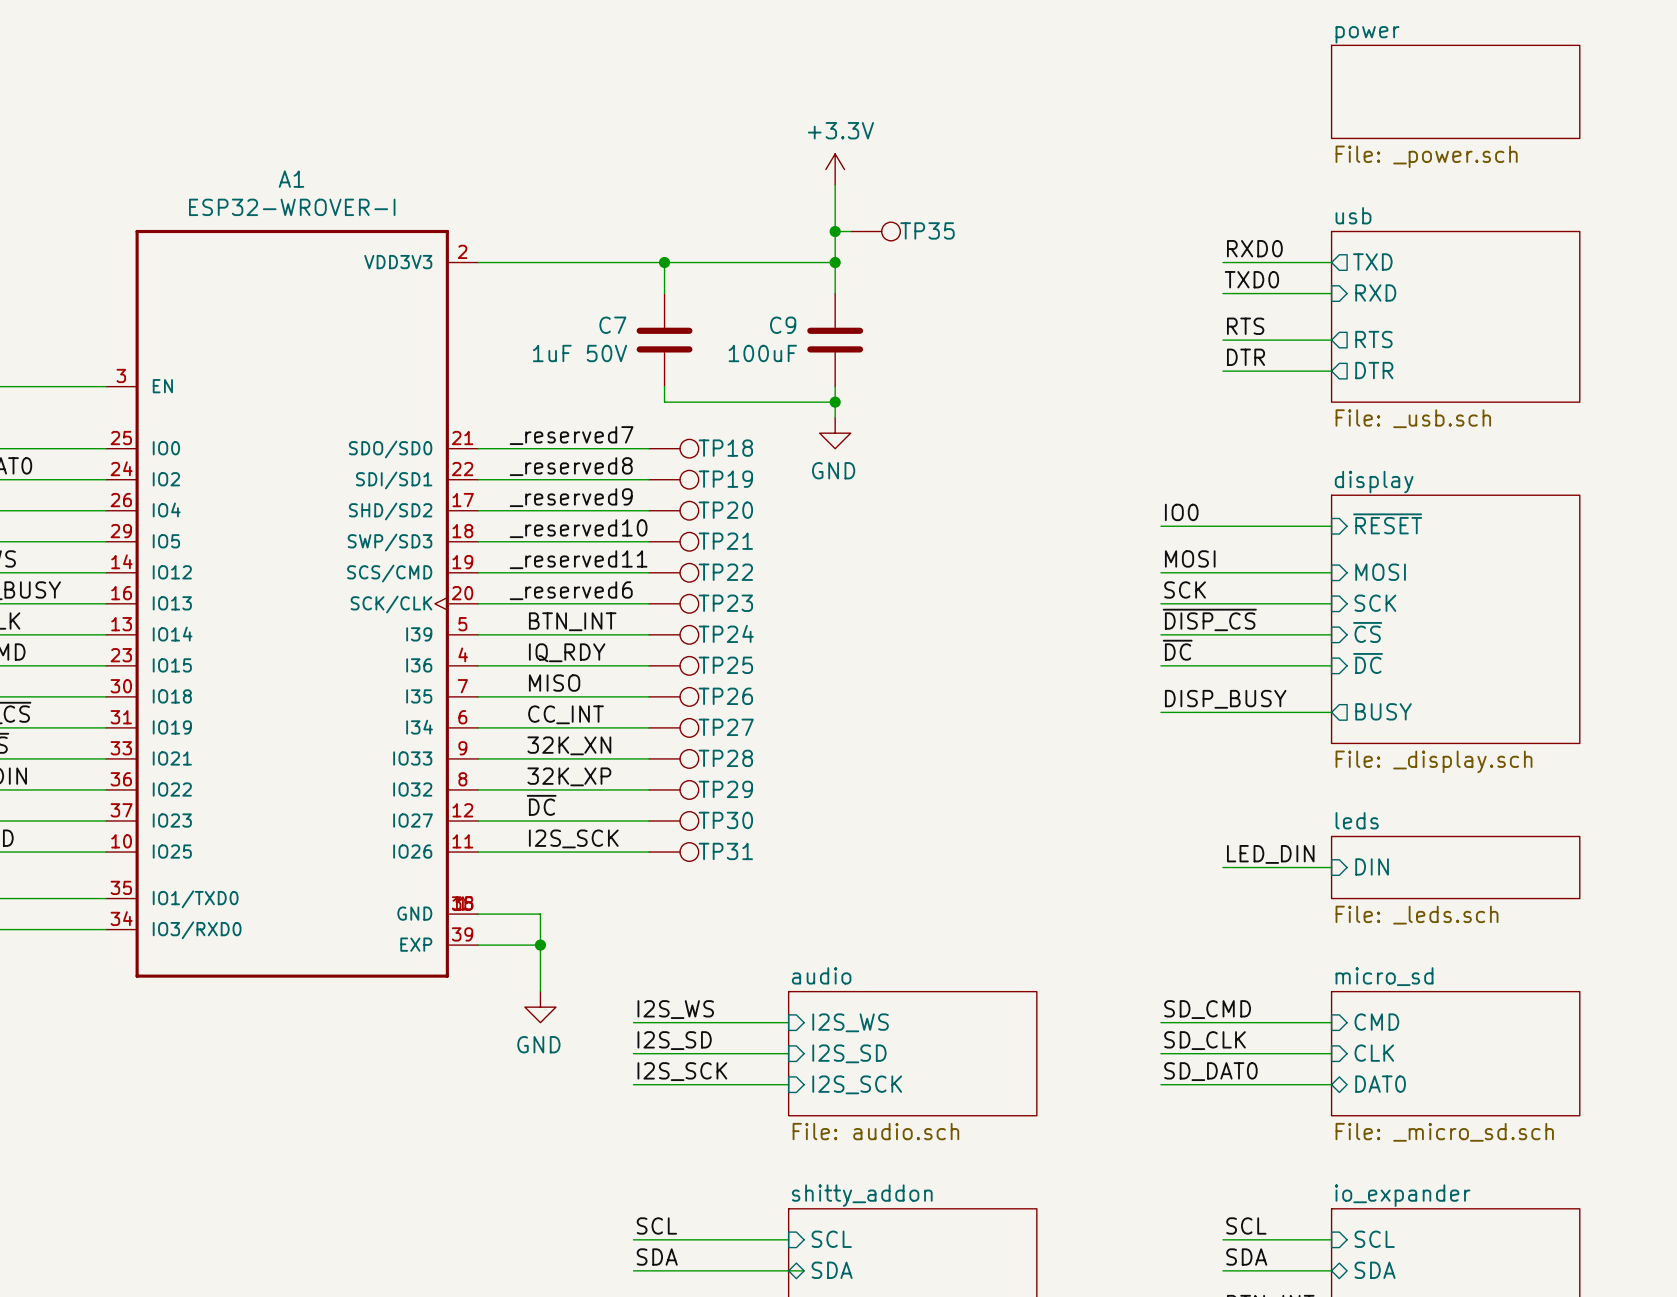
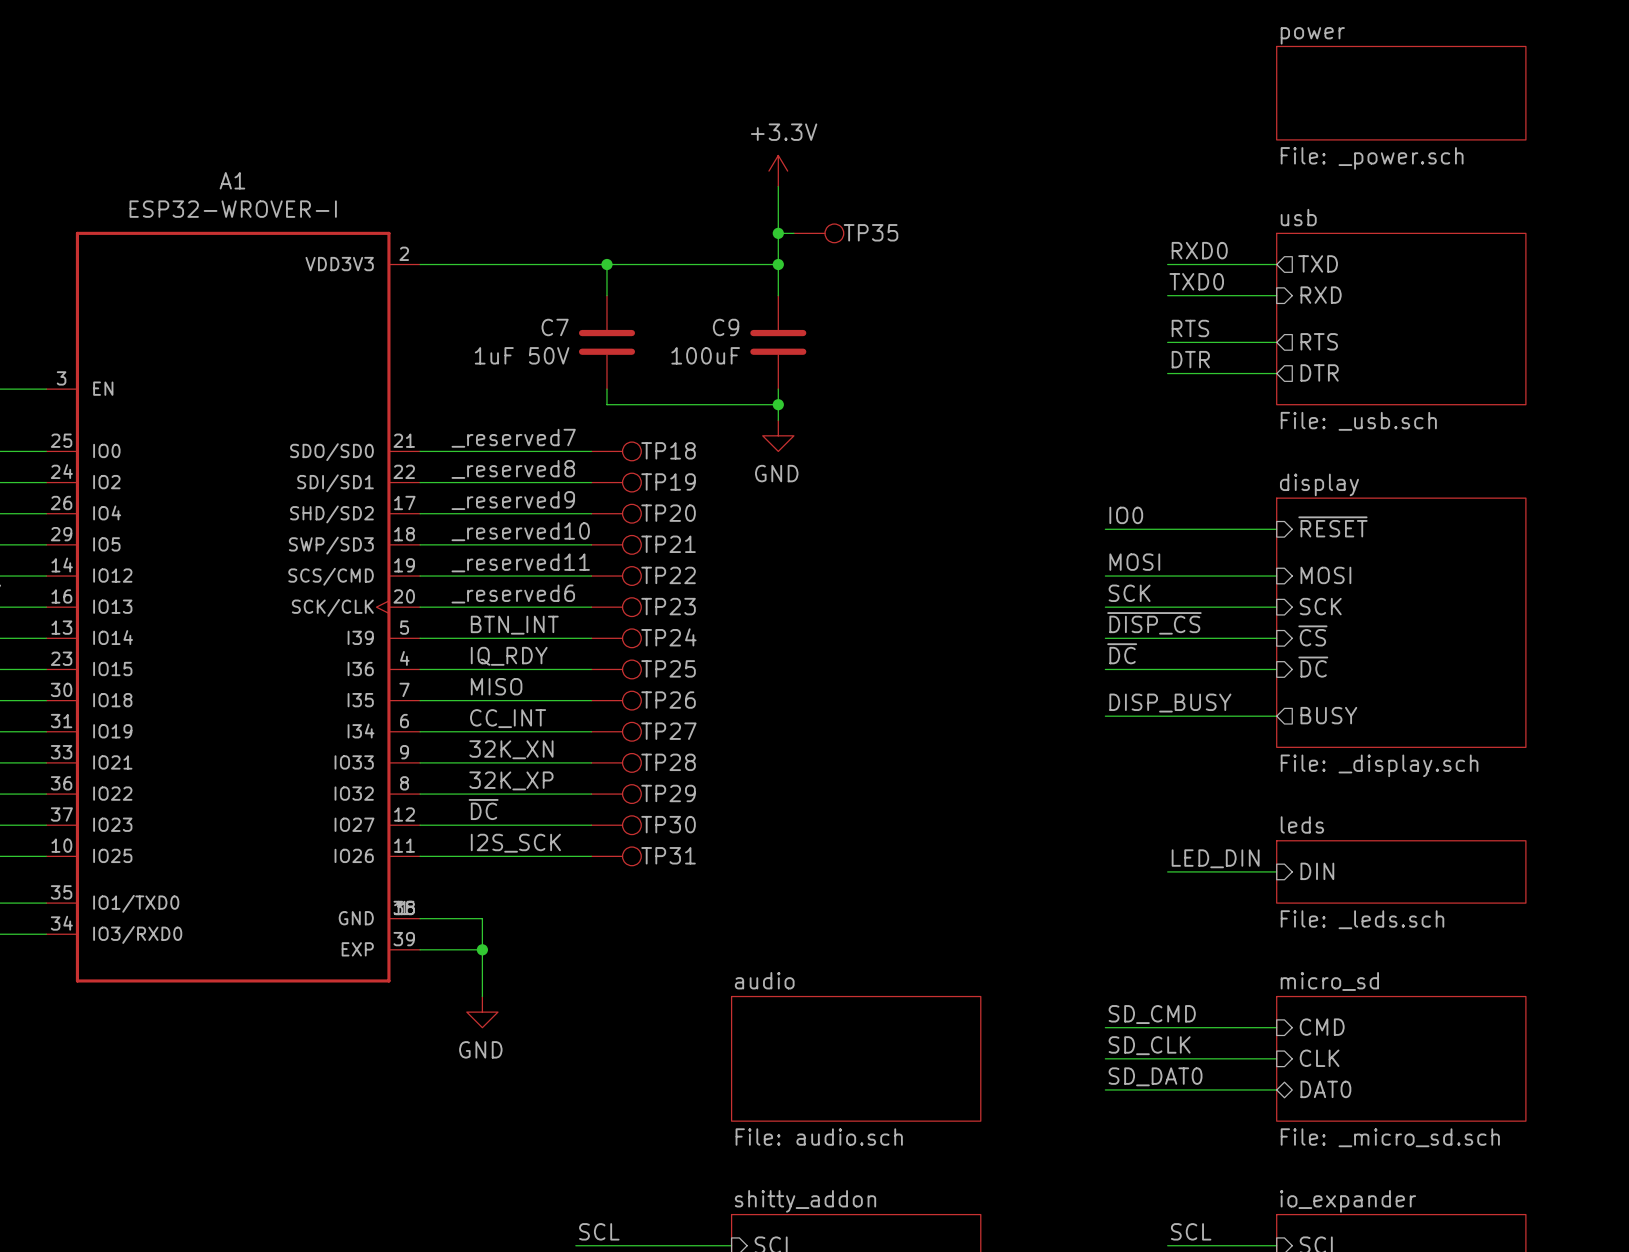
label: I2S_WS (675, 1009) -> none
wire: (633, 1022) (788, 1022) -> none
sheet pin: I2S_WS (850, 1022) -> none
label: I2S_SD (674, 1040) -> none
wire: (633, 1053) (788, 1053) -> none
sheet pin: I2S_SD (849, 1053) -> none
label: I2S_SCK (682, 1071) -> none
wire: (633, 1084) (788, 1084) -> none
sheet pin: I2S_SCK (857, 1084) -> none

